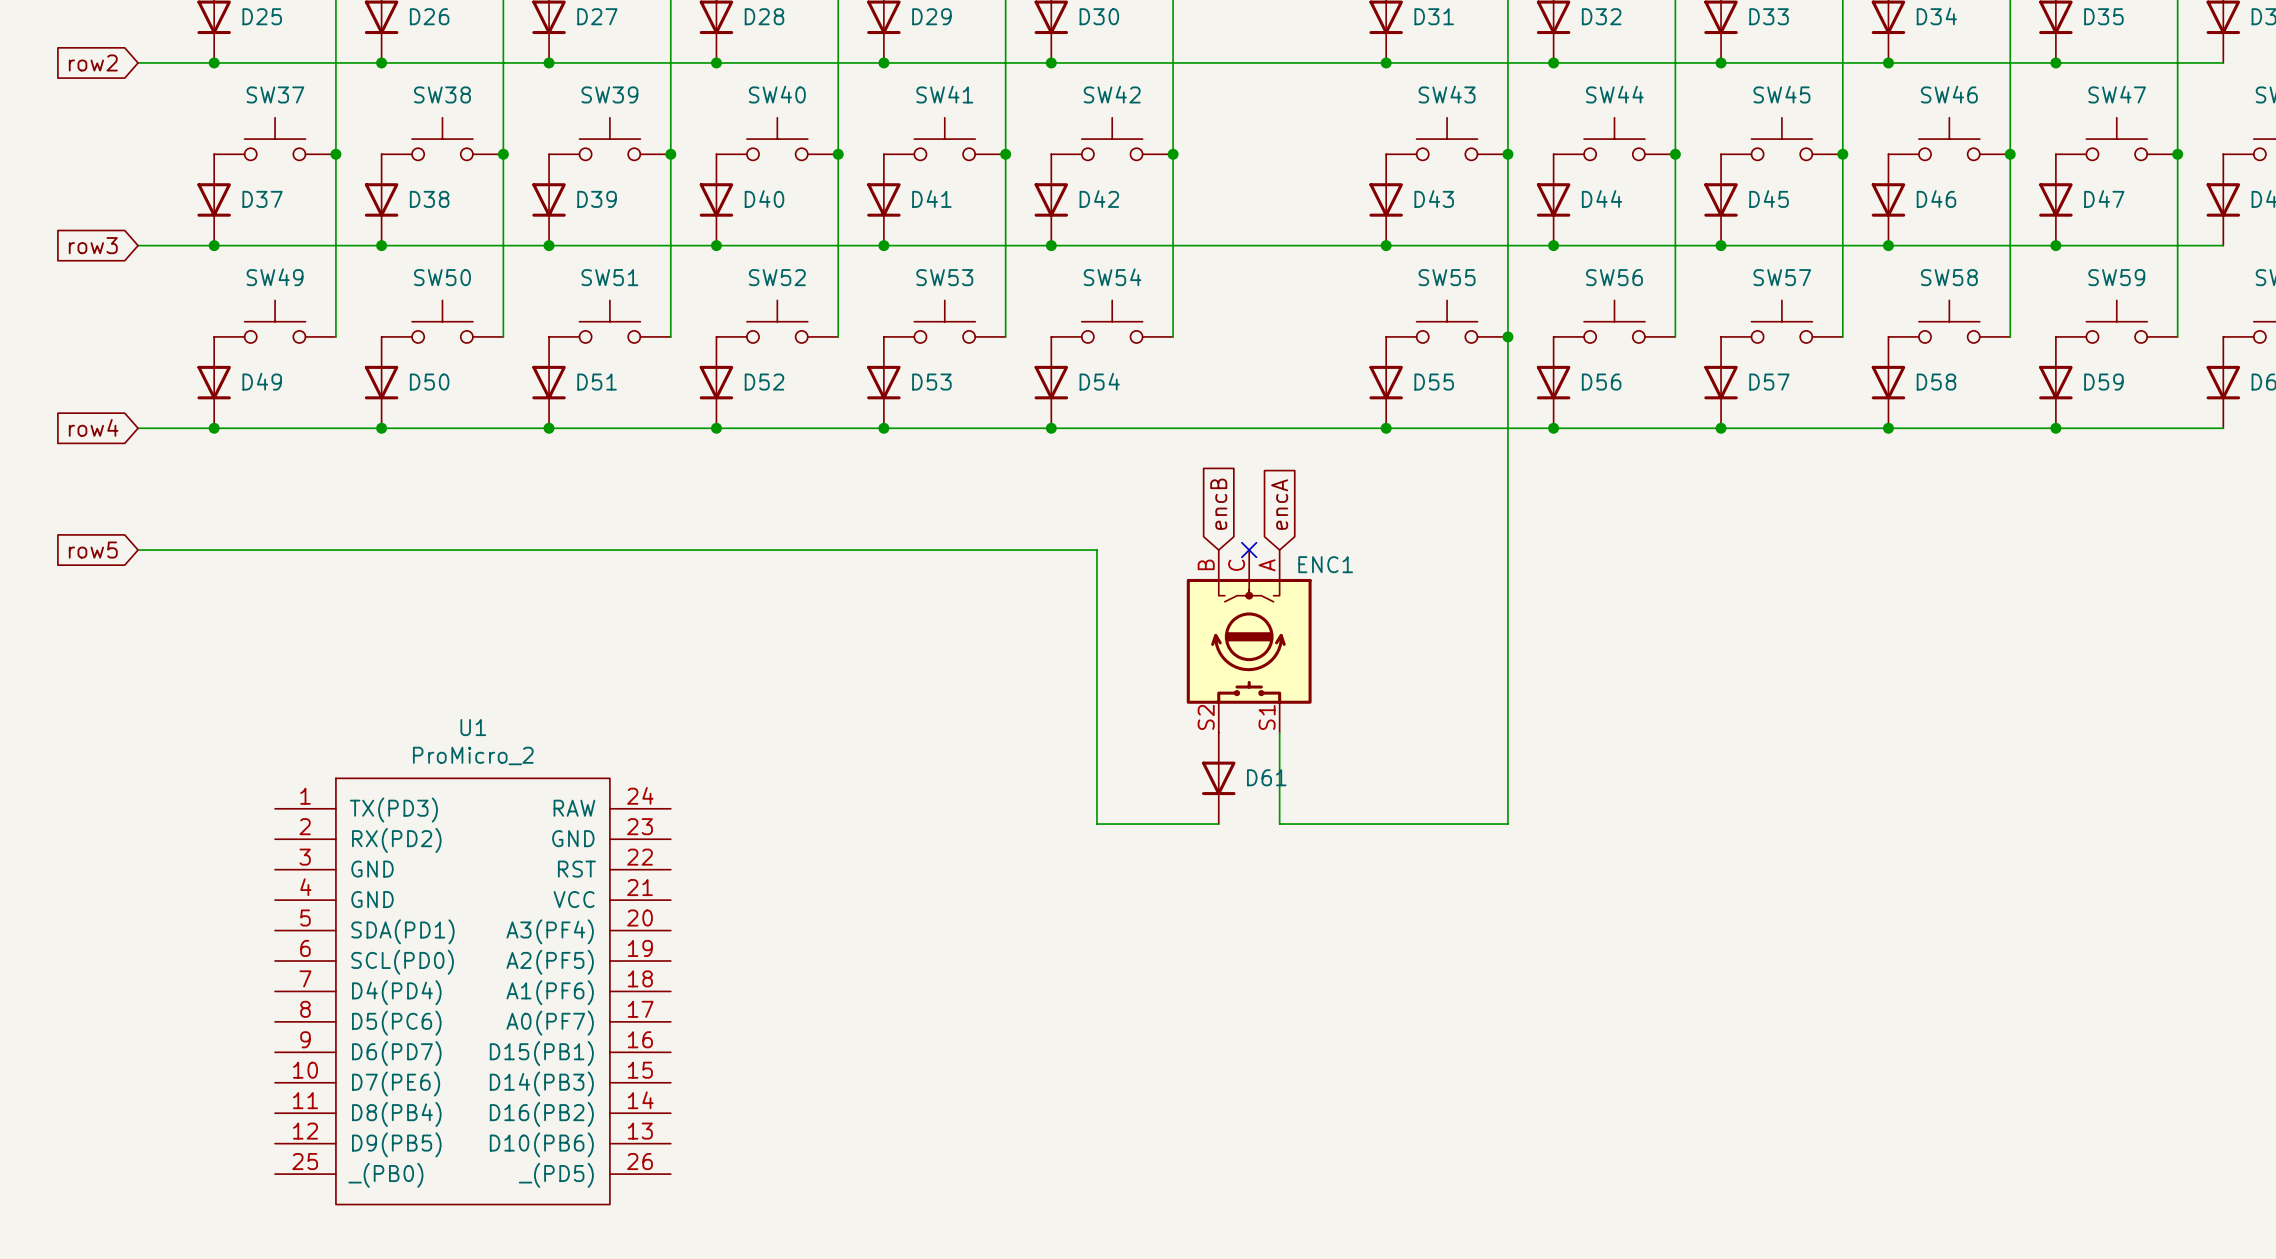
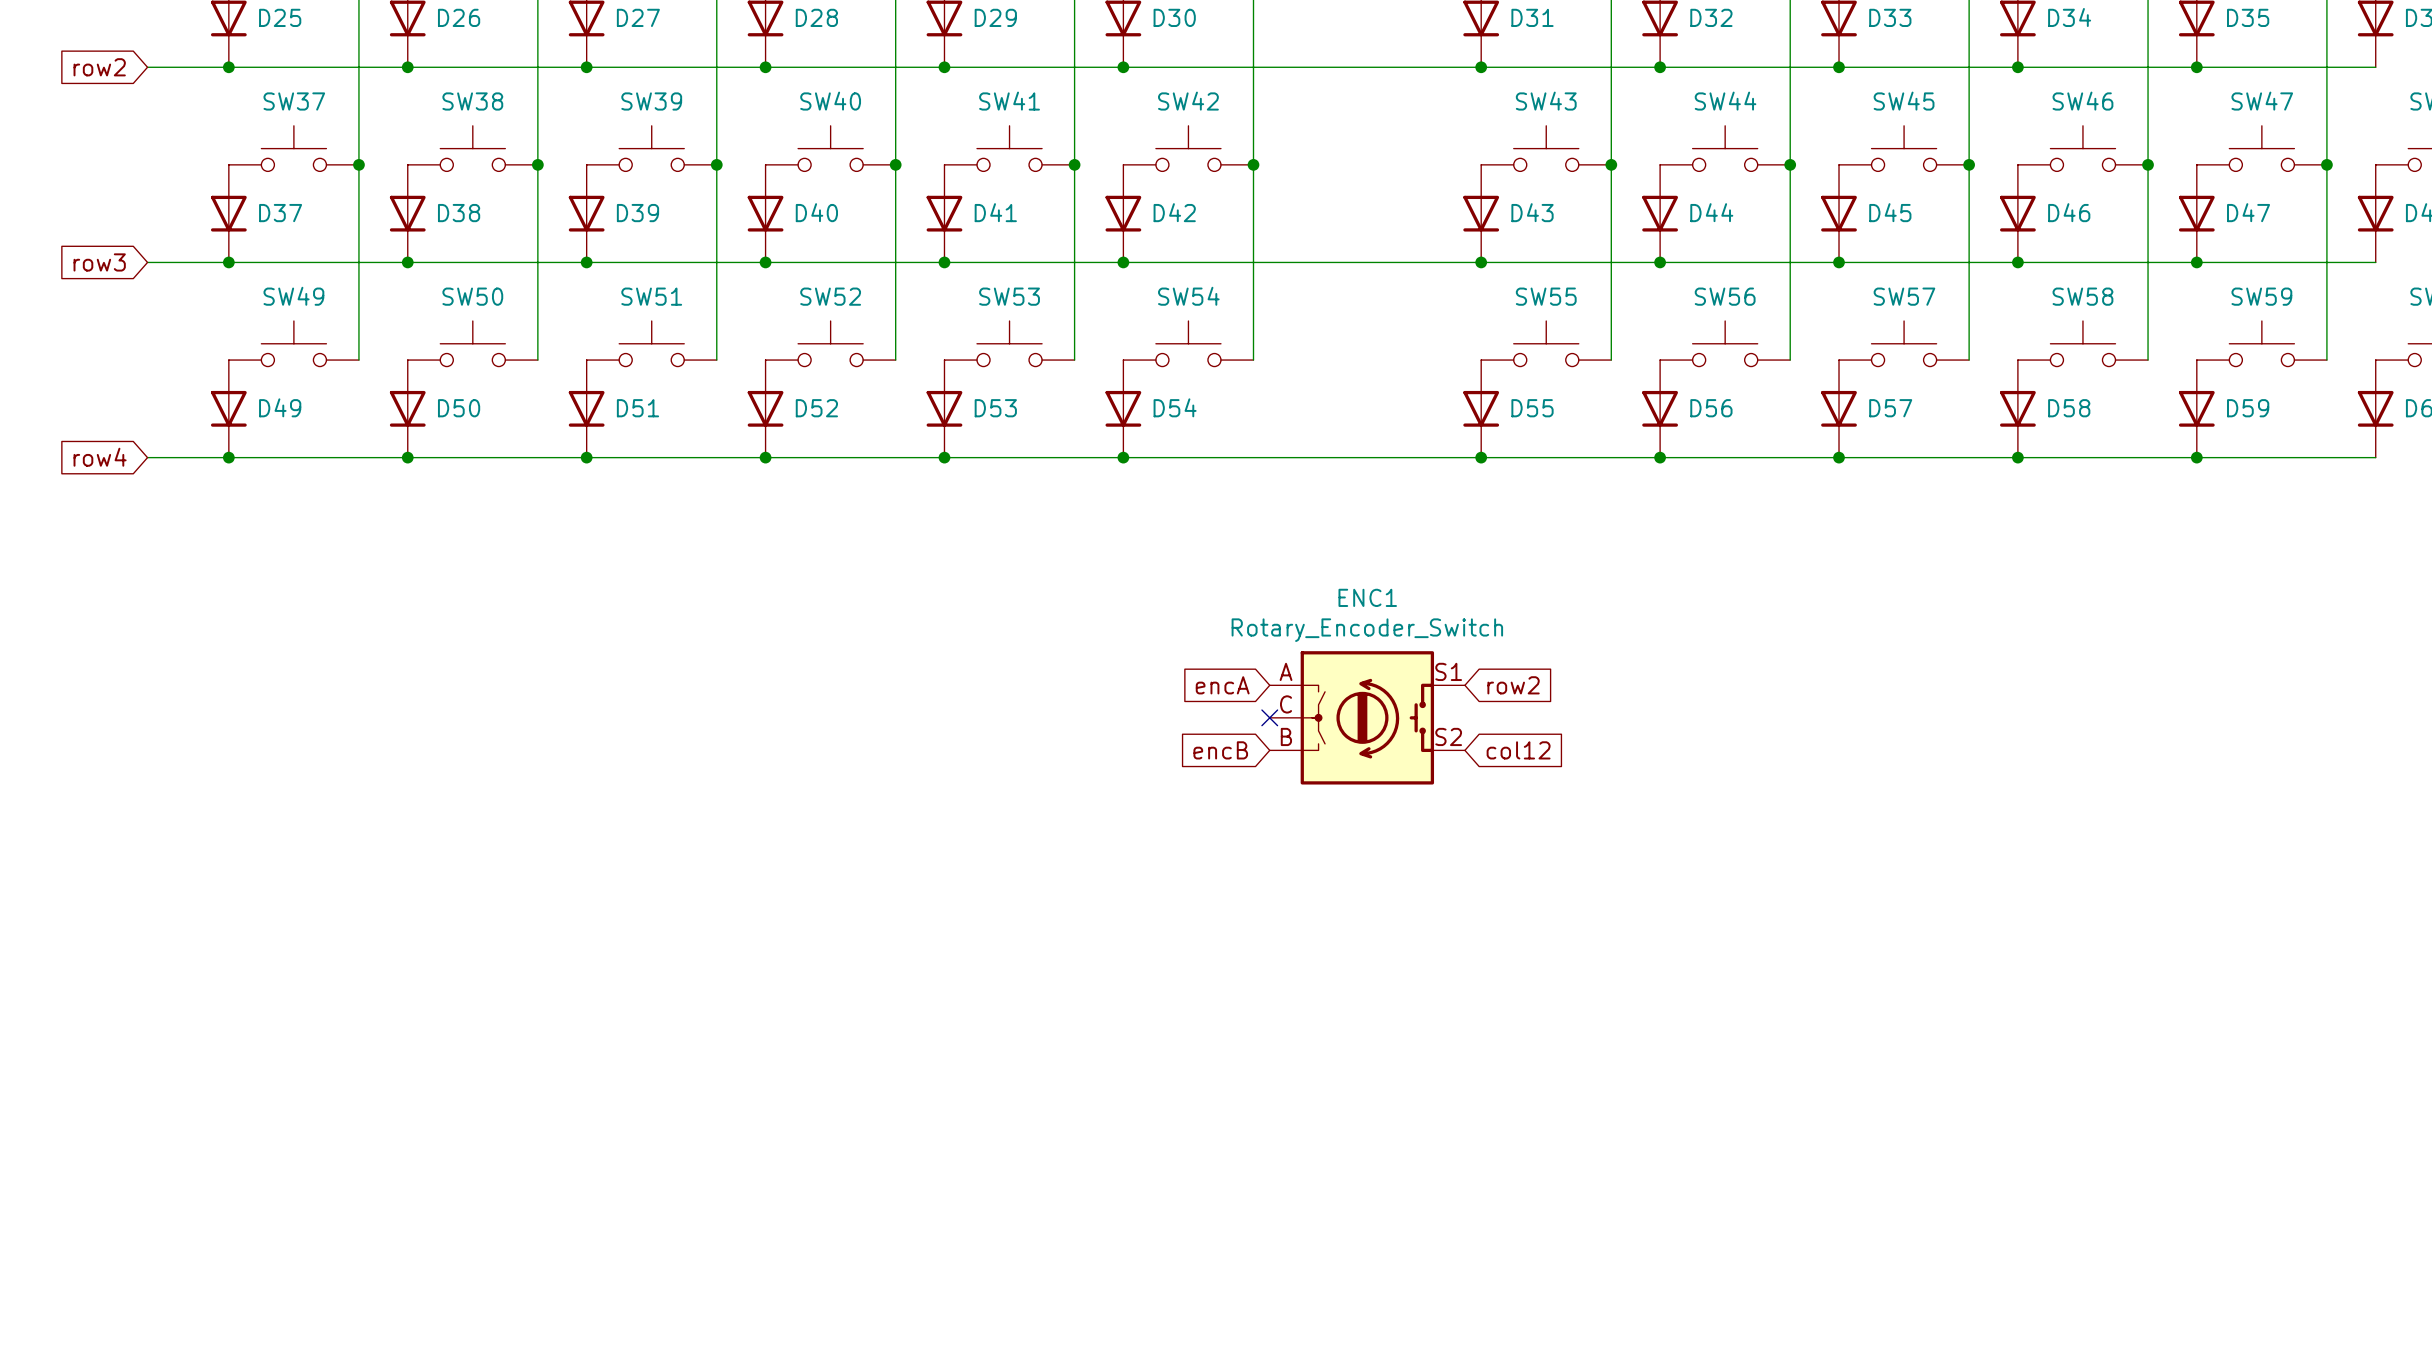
wire: (1507, 336) (1507, 824) (1279, 824) (1279, 732) -> none
junction: (1507, 336) -> none
global label rotation: 0° (1218, 504) -> 90° counterclockwise (1220, 750)
global label position: encB (1218, 504) -> encB (1220, 750)
global label rotation: 0° (1279, 504) -> 90° counterclockwise (1222, 685)
global label position: encA (1279, 504) -> encA (1222, 685)
global label: row5 (93, 550) -> none
wire: (138, 550) (1096, 550) (1096, 824) (1218, 824) -> none
no-connect mark: (1249, 550) -> none
ENC1 name position: ENC1 (1325, 564) -> ENC1 (1367, 597)
ENC1 value: none -> Rotary_Encoder_Switch (1367, 630)
ENC1 rotation: 0° (1249, 641) -> 90° counterclockwise (1367, 717)
global label: none -> row2 (1513, 685)
no-connect mark: none -> (1269, 717)
global label: none -> col12 (1518, 750)
D61: (1218, 778) -> none
U1: ProMicro_2 (472, 991) -> none

